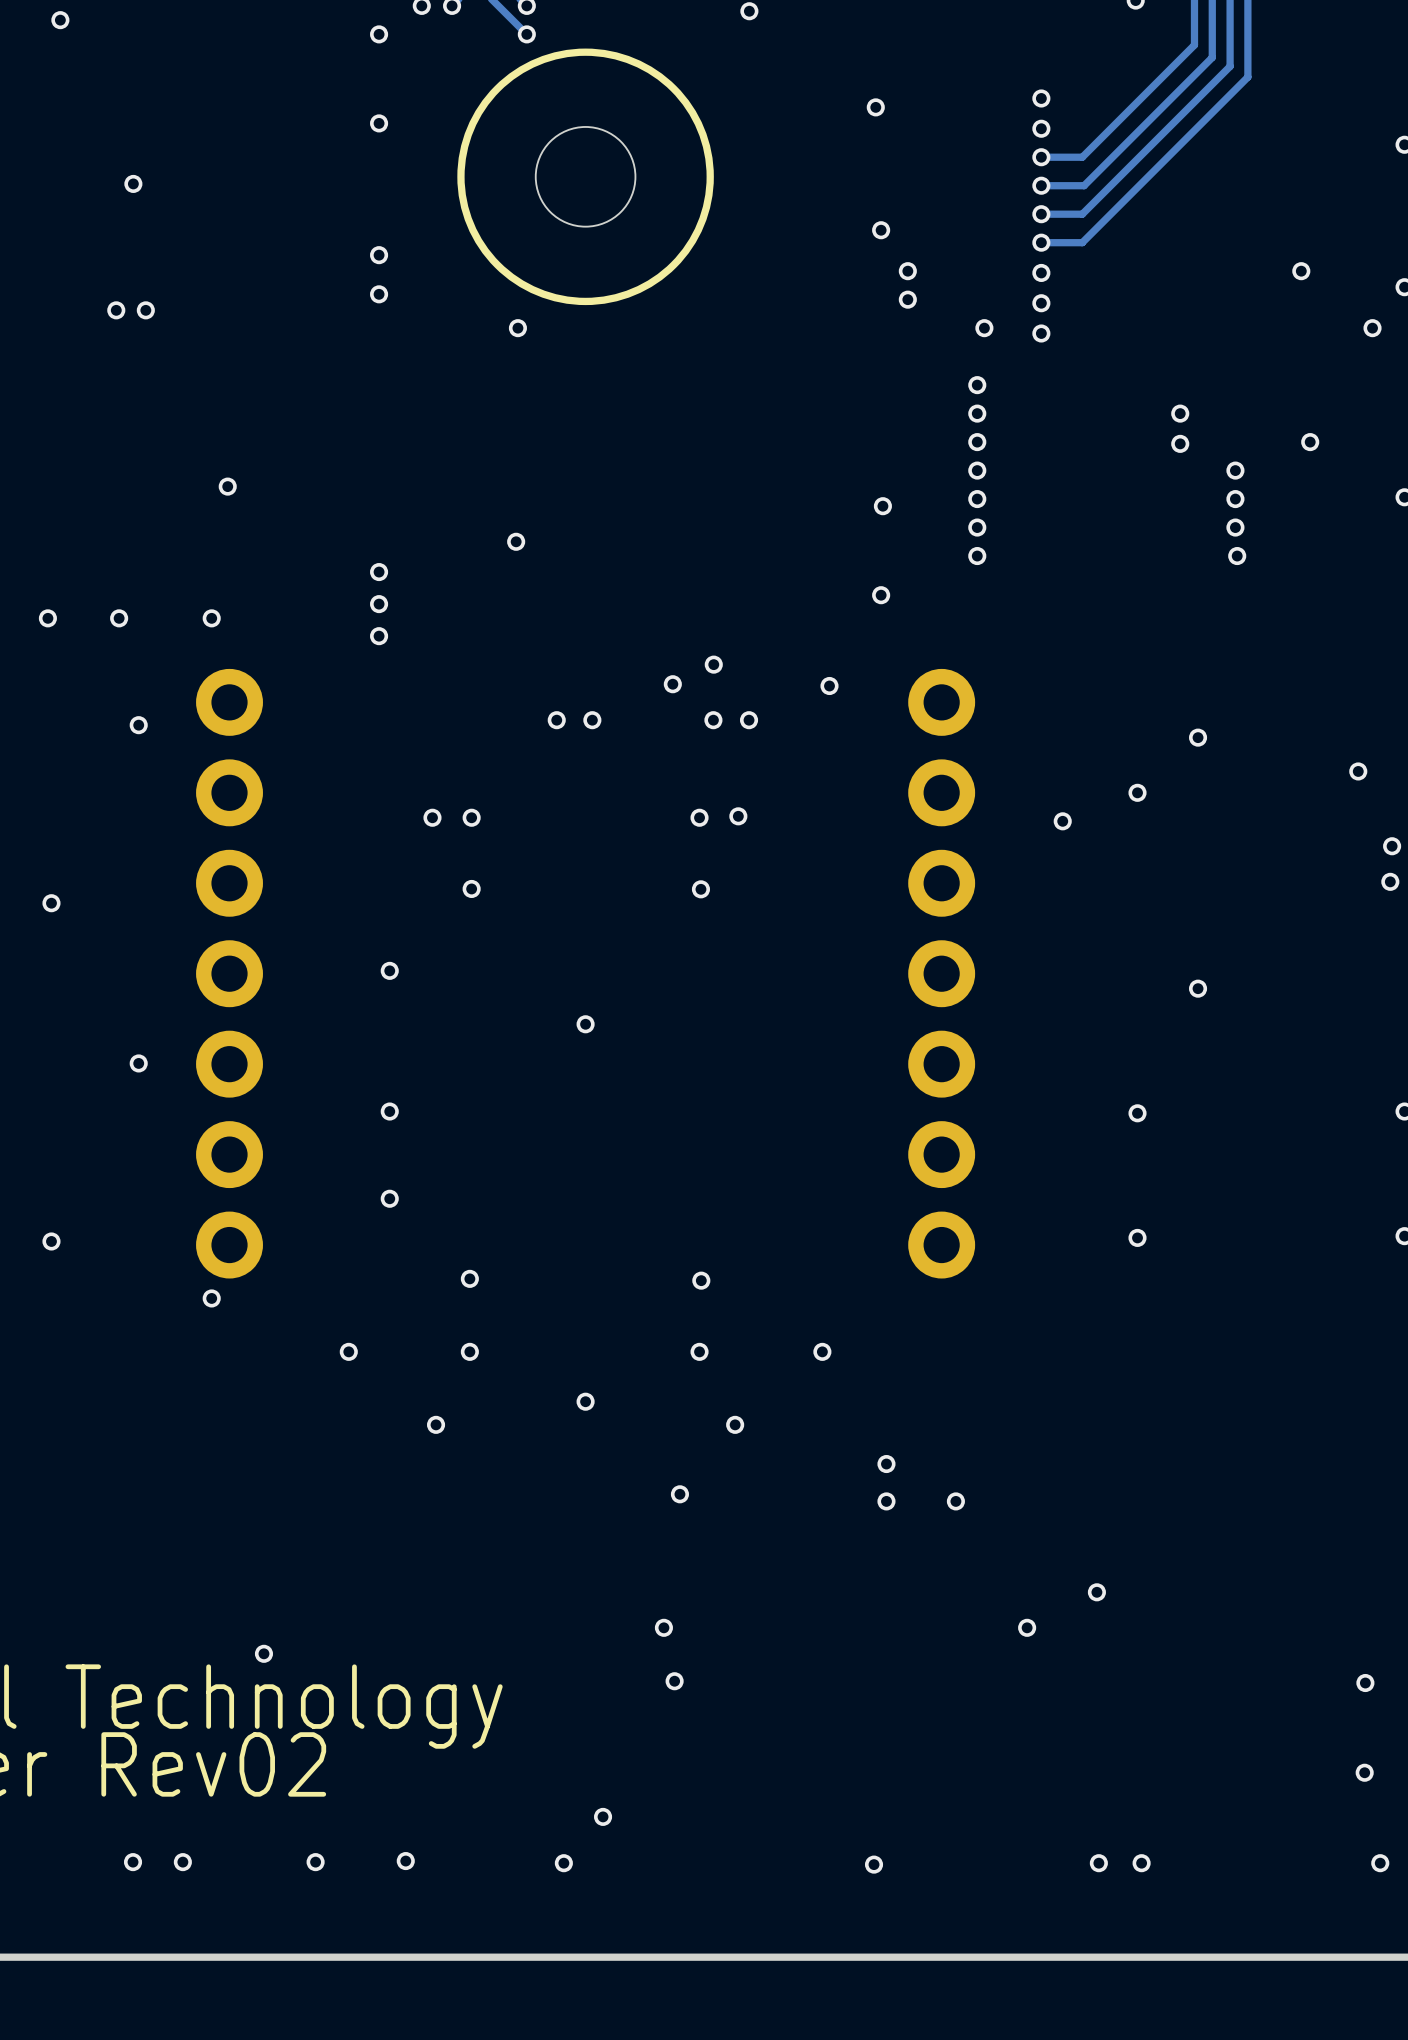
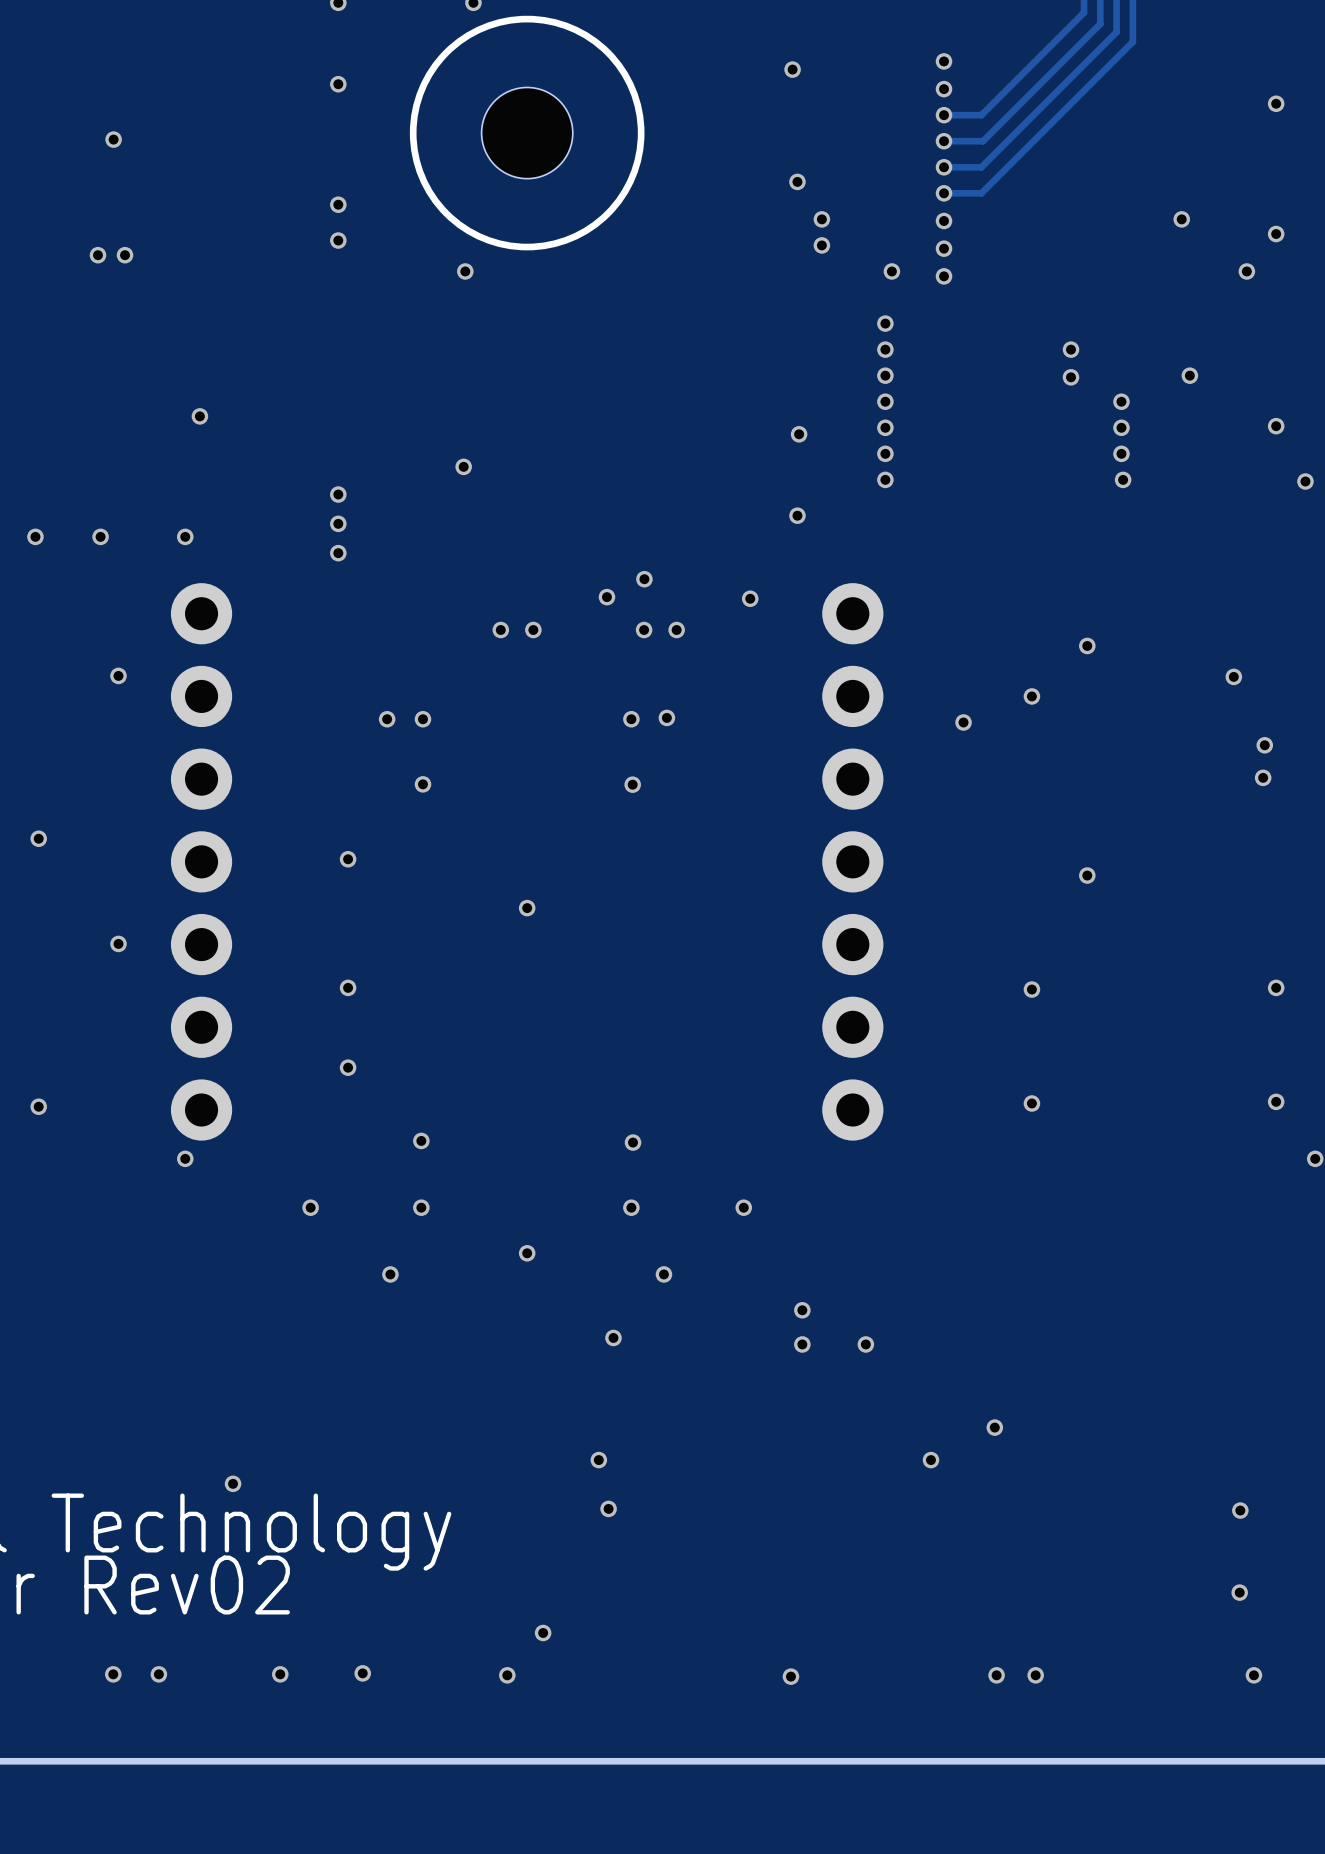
via position: (138, 725) -> (118, 675)
via position: (51, 903) -> (38, 838)

